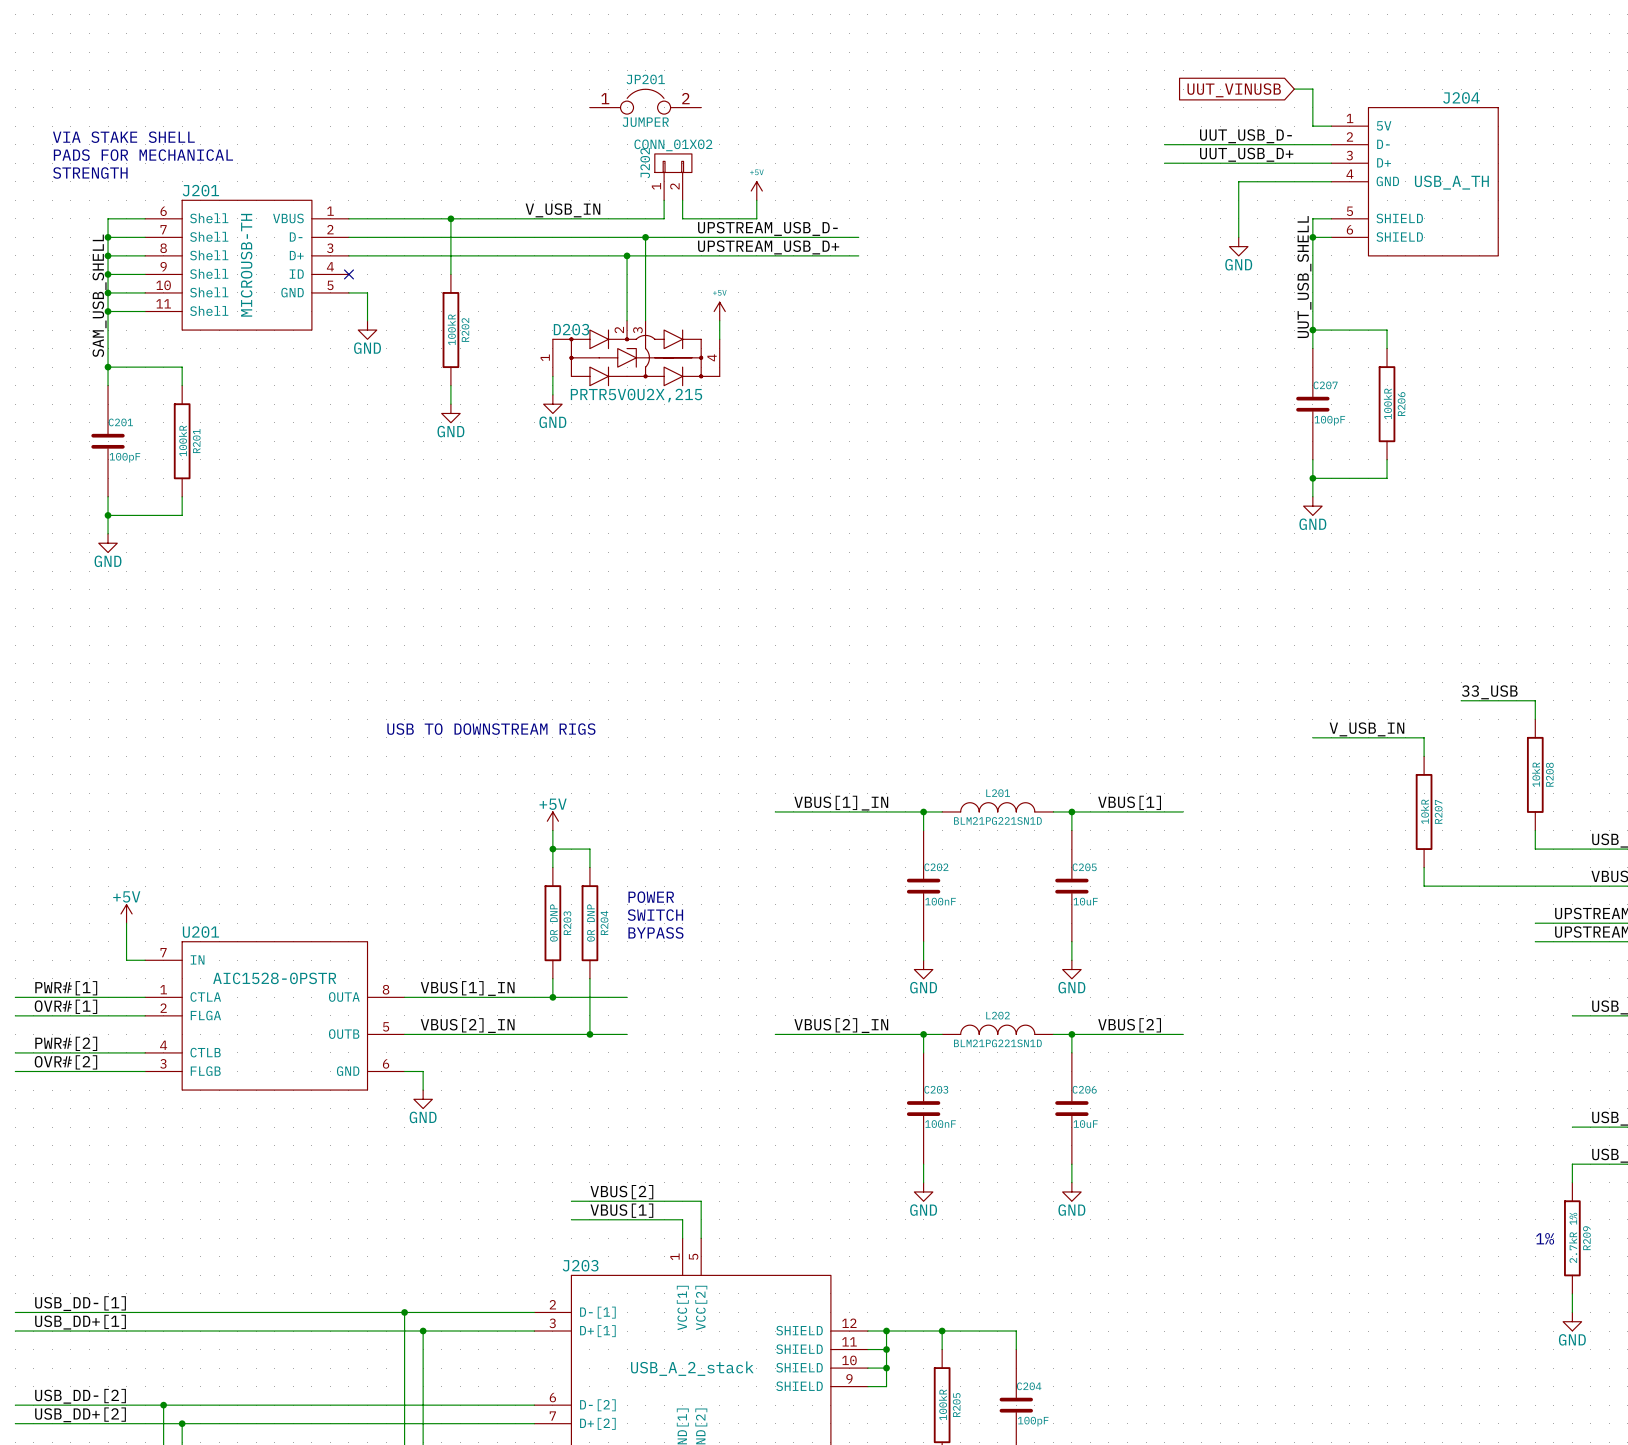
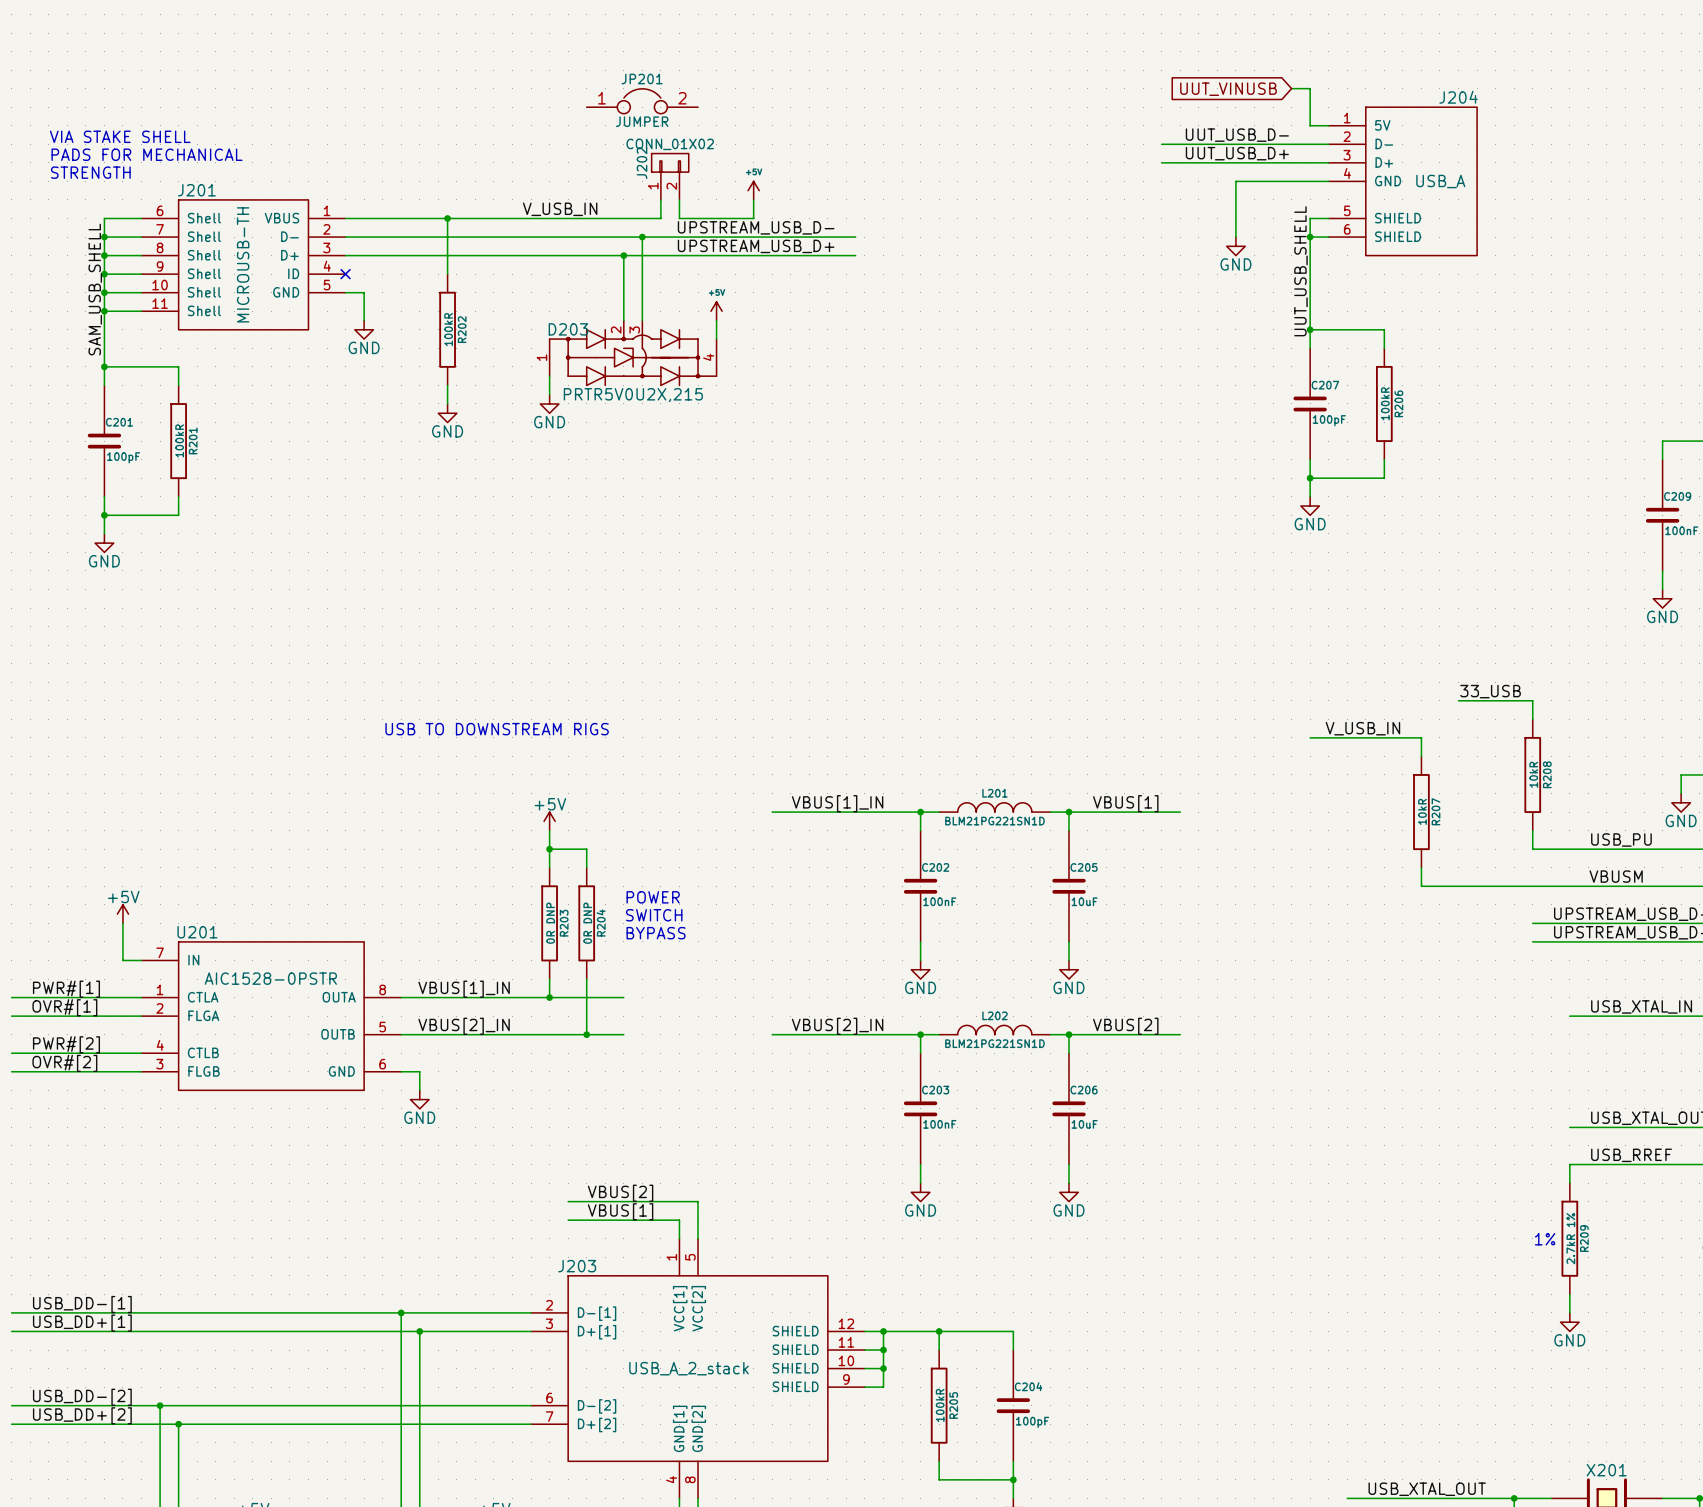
J204 symbol: [1331, 107, 1499, 256] -> [1328, 107, 1478, 256]
J204 value: USB_A_TH (1451, 182) -> USB_A (1440, 181)

